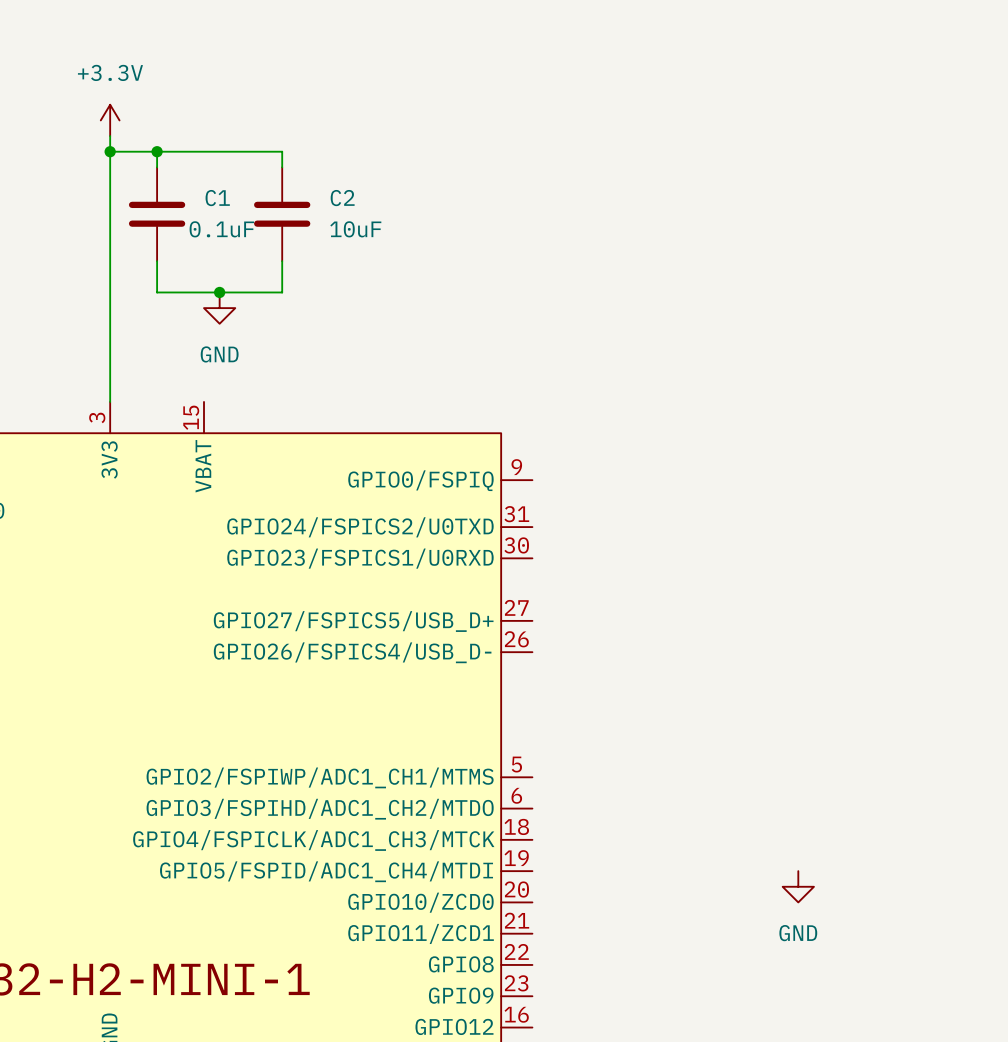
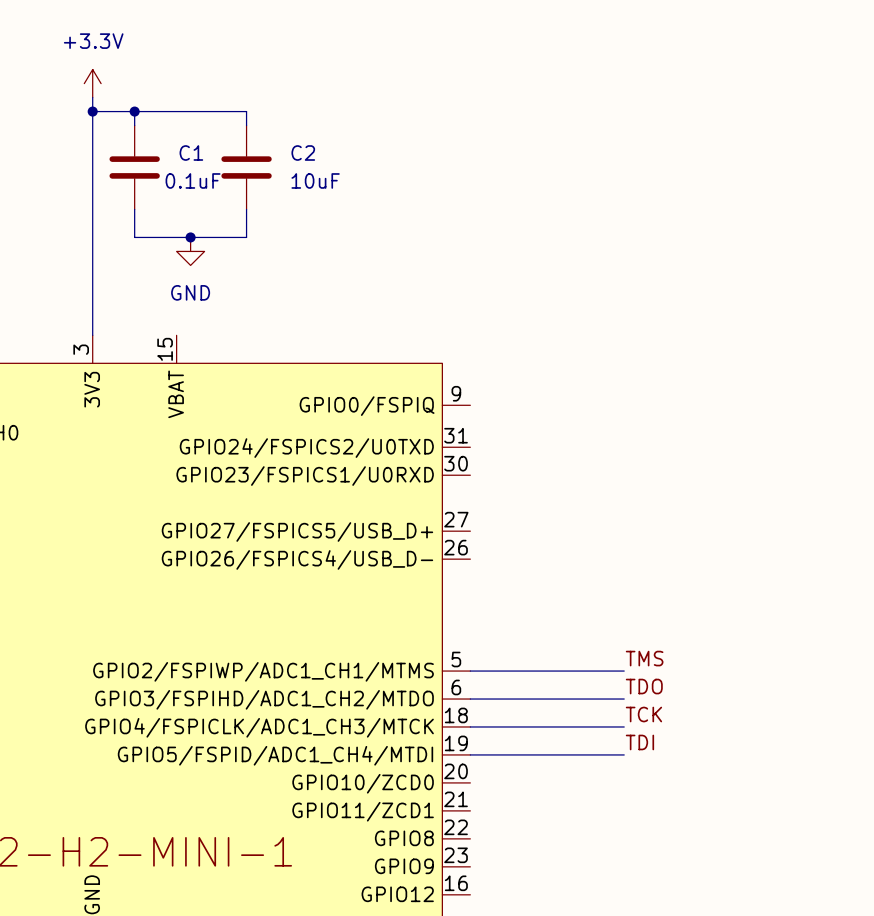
label: none -> TMS (644, 658)
wire: none -> (470, 671) (624, 671)
label: none -> TDO (644, 686)
wire: none -> (470, 699) (624, 699)
label: none -> TCK (643, 714)
wire: none -> (470, 726) (624, 726)
label: none -> TDI (639, 742)
wire: none -> (470, 754) (624, 754)
power symbol: GND (798, 886) -> none

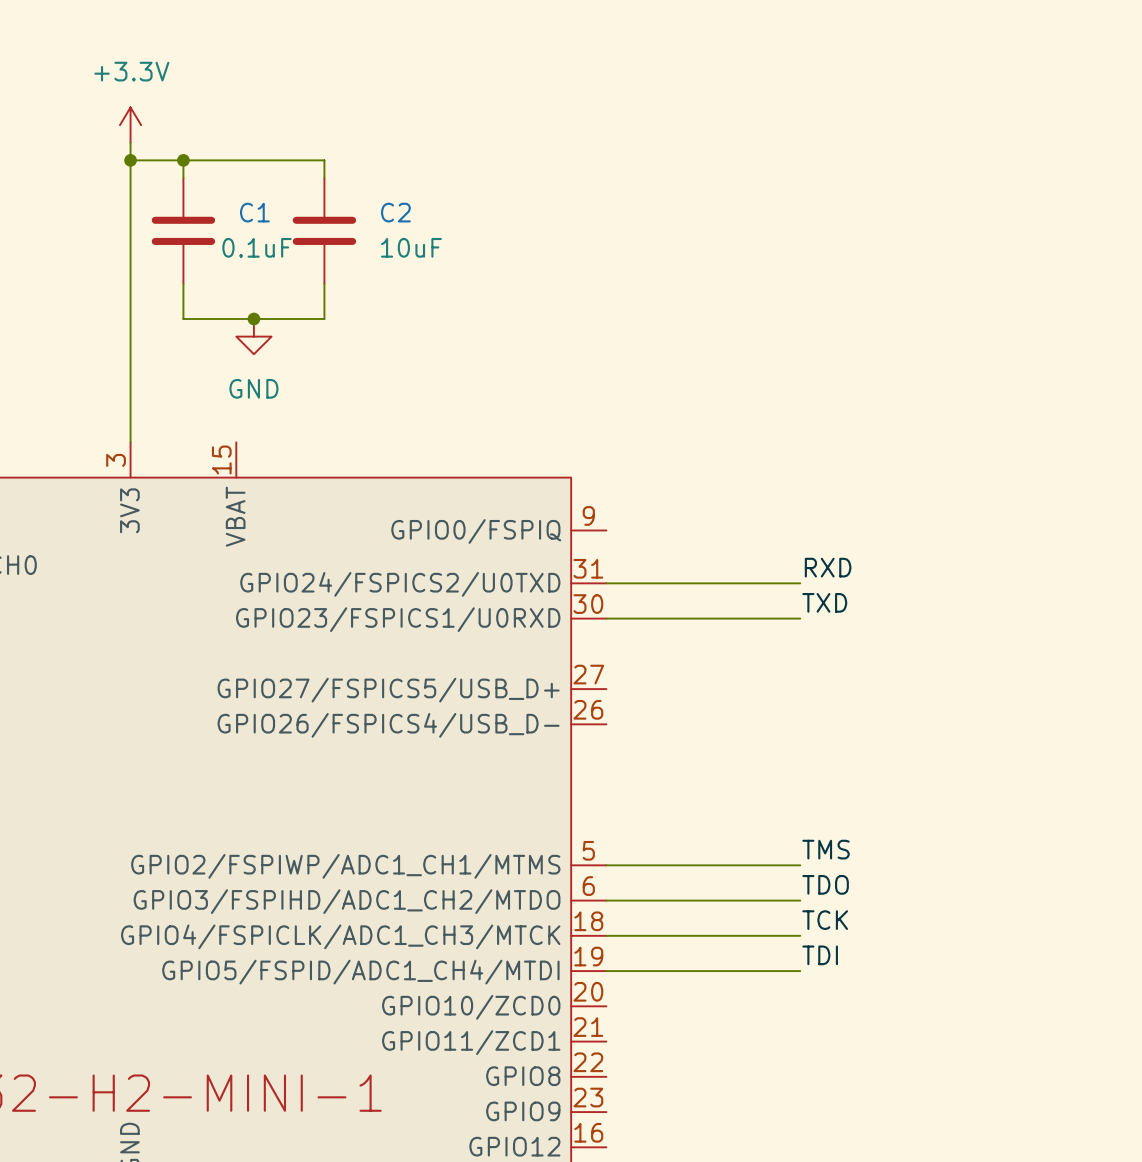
label: none -> RXD (828, 567)
wire: none -> (606, 583) (800, 583)
label: none -> TXD (824, 602)
wire: none -> (606, 618) (800, 618)

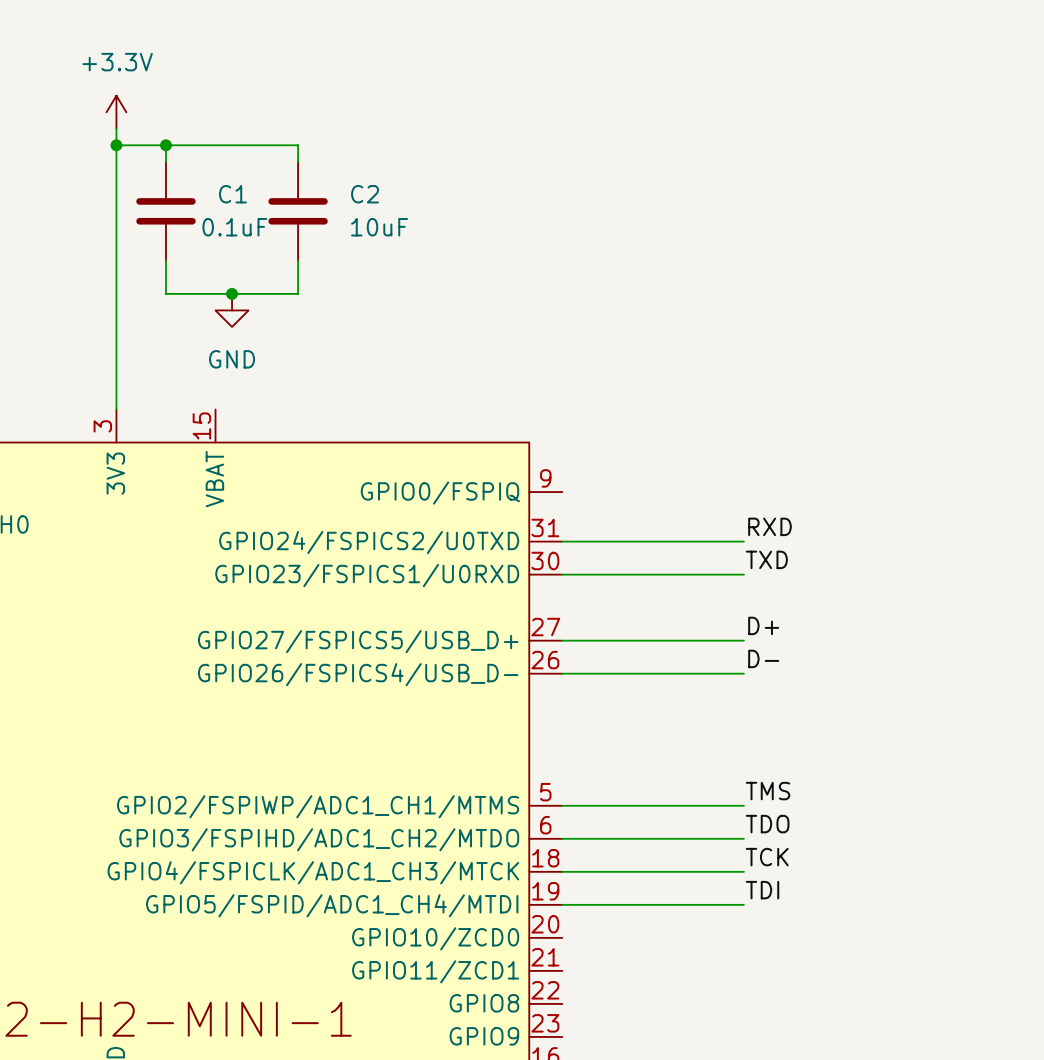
label: none -> D+ (763, 625)
wire: none -> (562, 640) (743, 640)
label: none -> D- (763, 658)
wire: none -> (562, 673) (743, 673)

